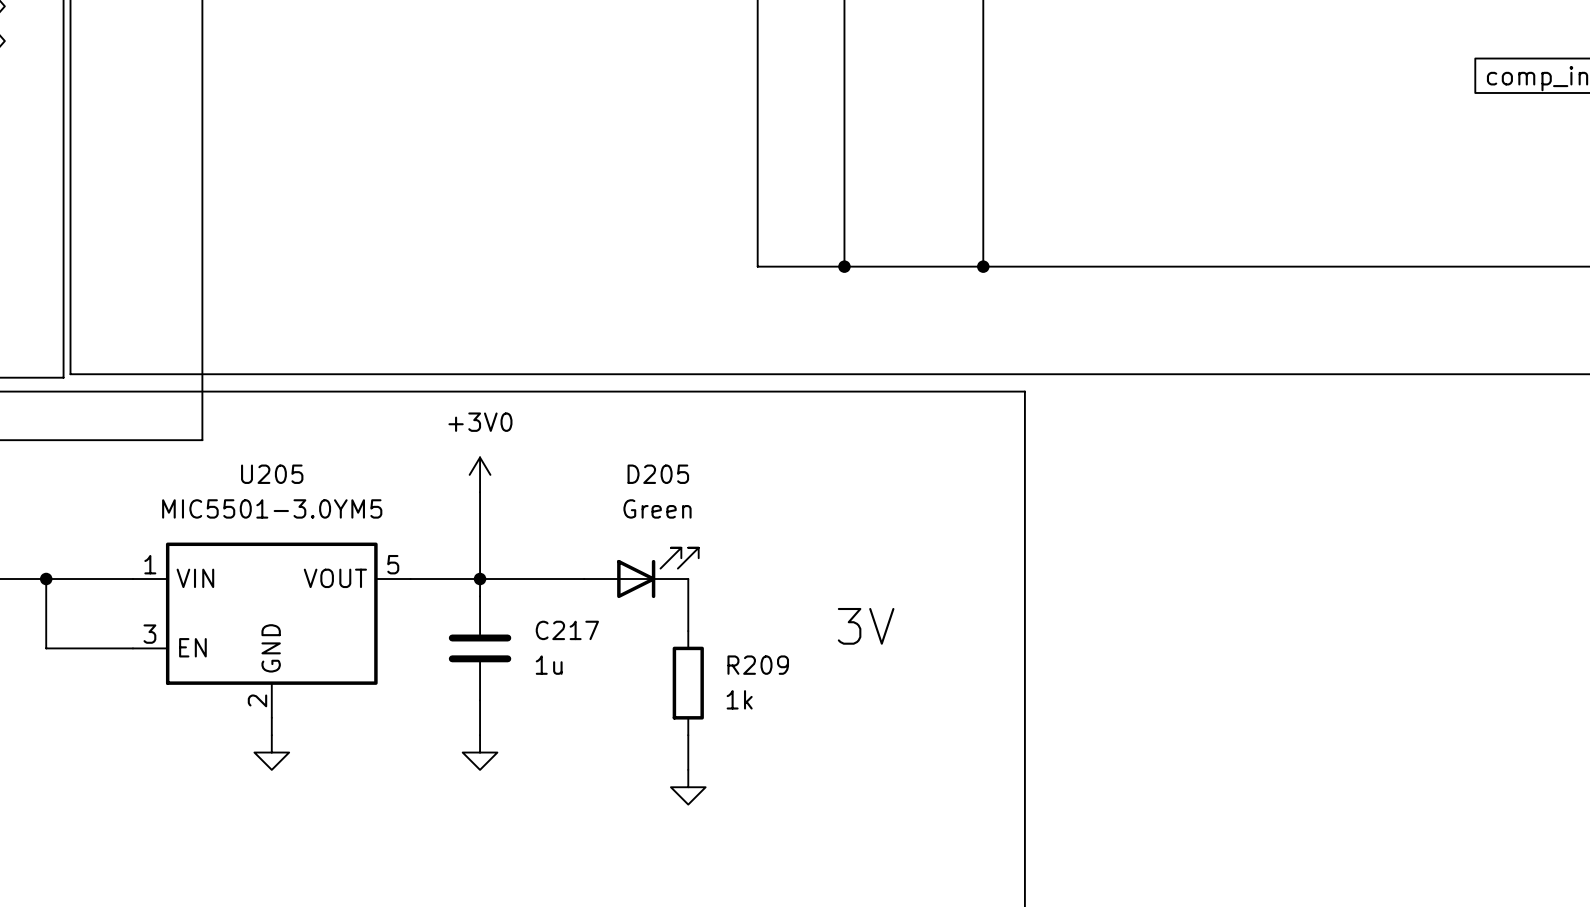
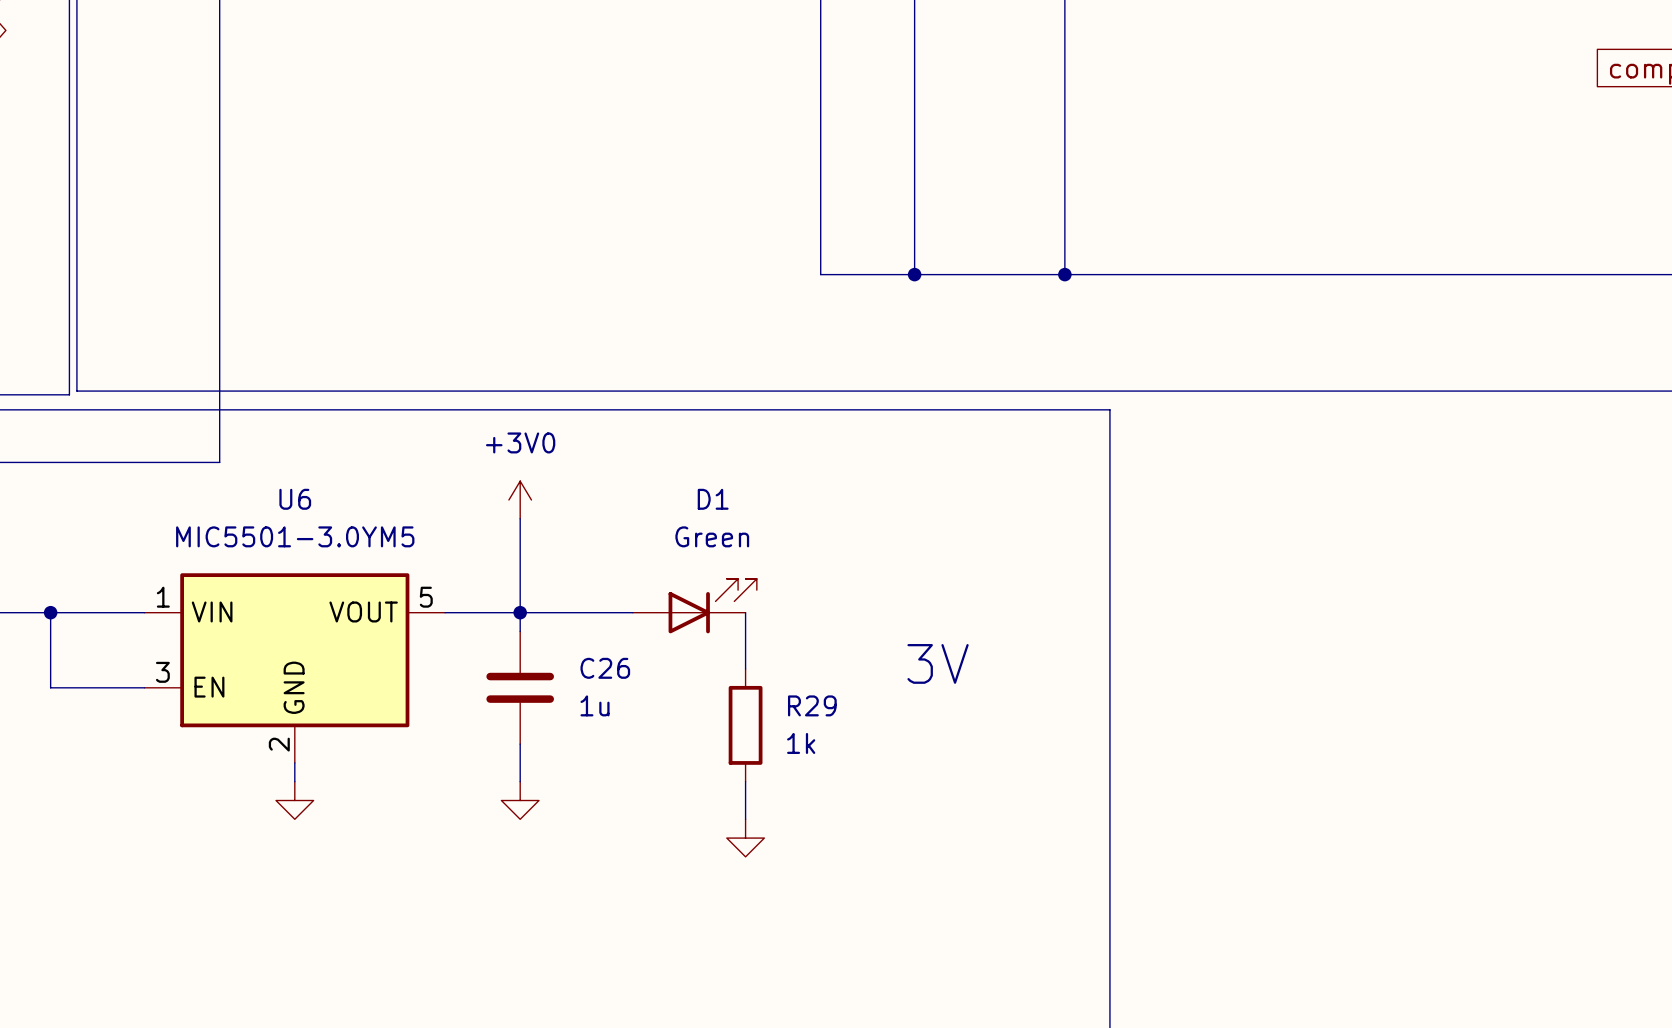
U205 name: U205 (272, 474) -> U6 (295, 499)
D205 name: D205 (658, 474) -> D1 (713, 499)
C217 name: C217 (567, 630) -> C26 (605, 668)
R209 name: R209 (758, 665) -> R29 (812, 705)

